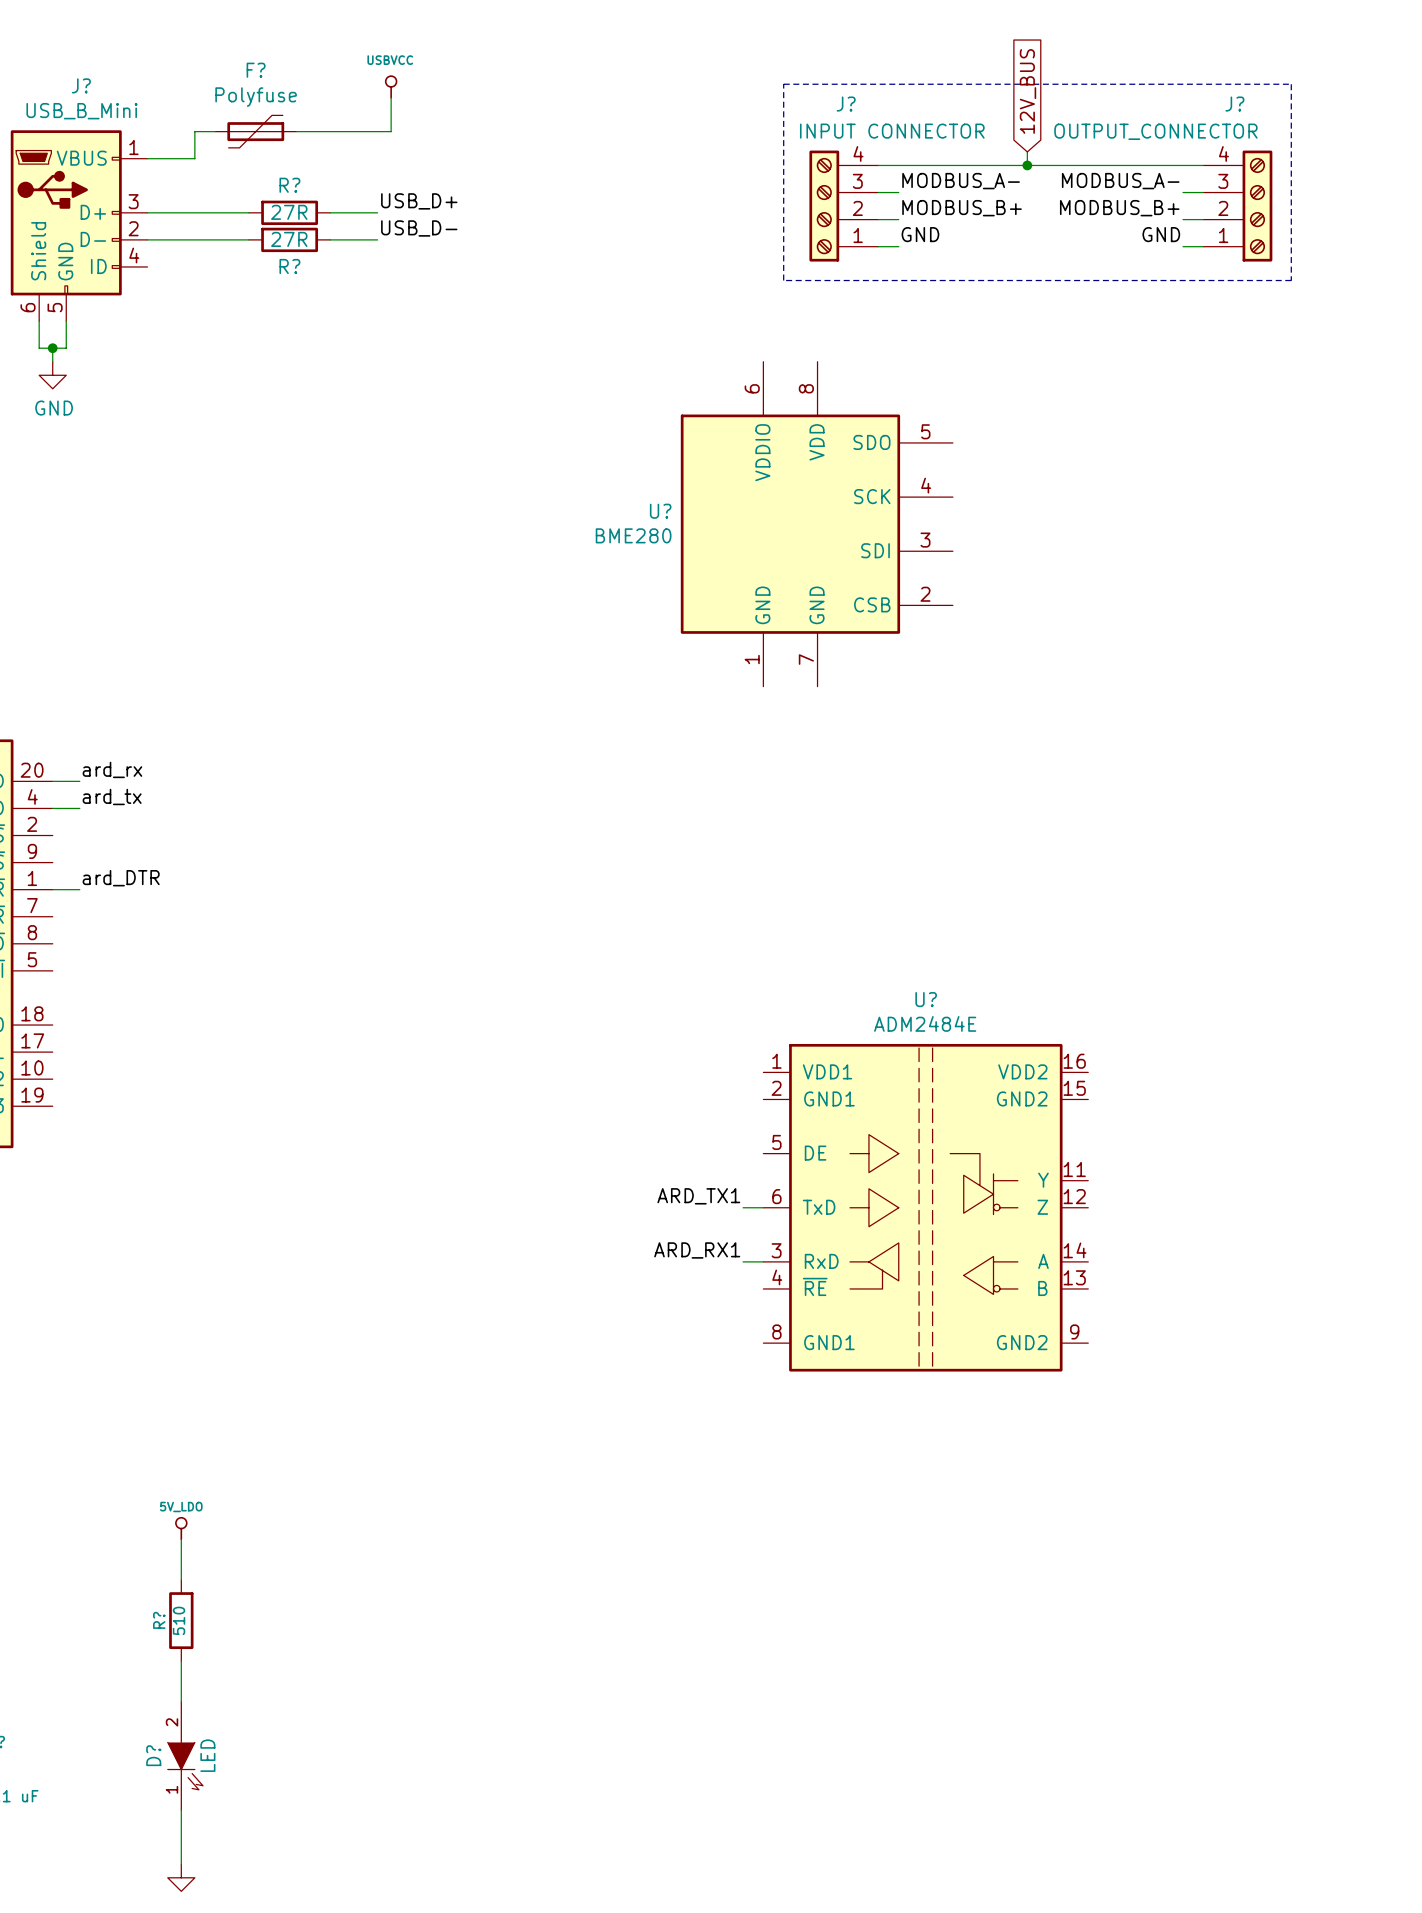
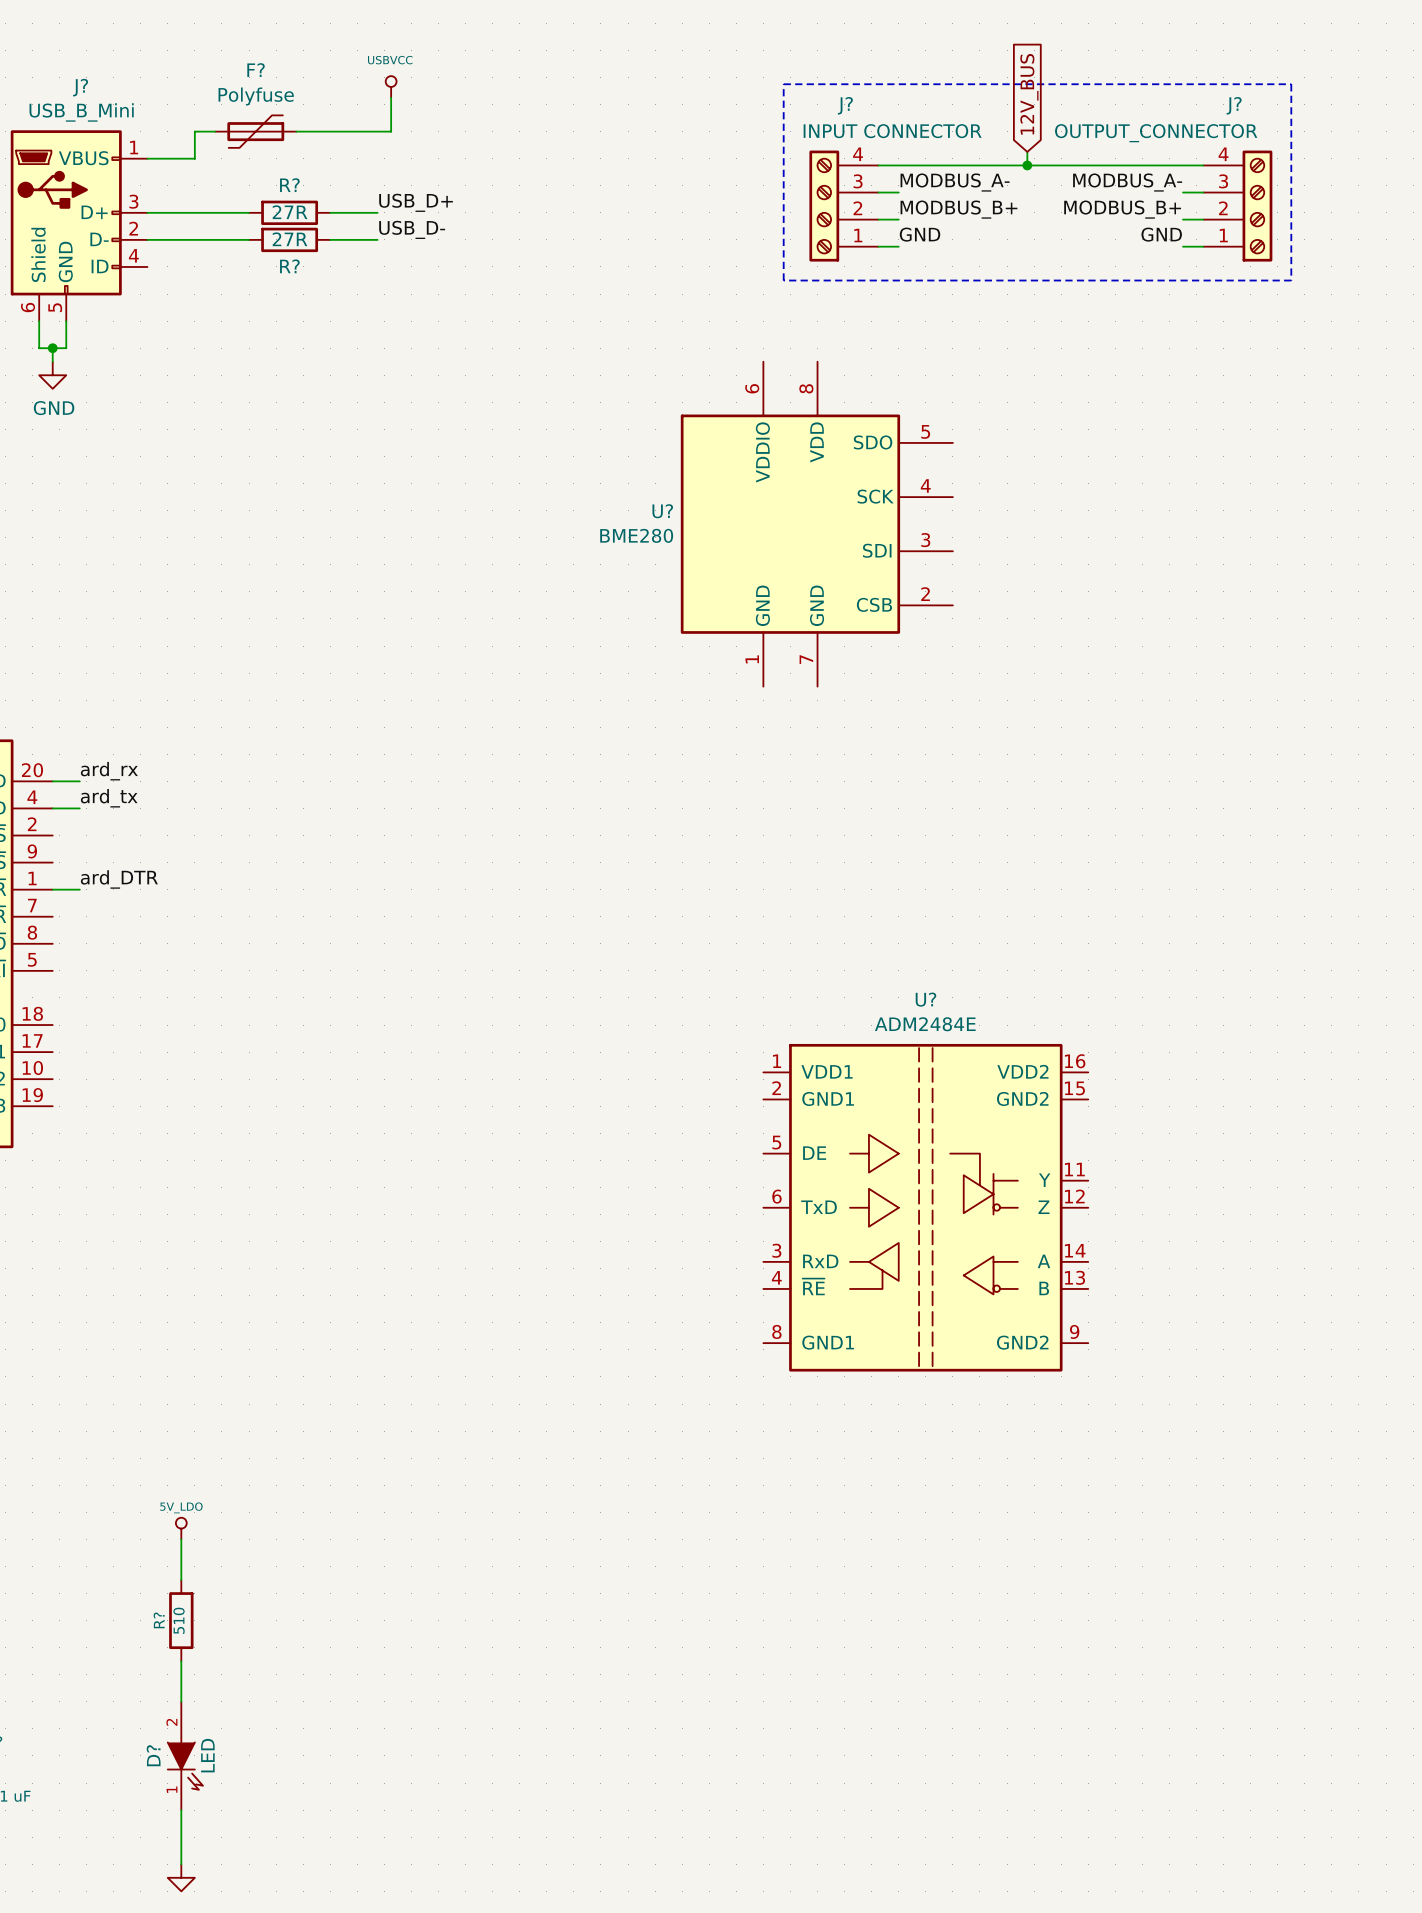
label: ARD_TX1 (698, 1196) -> none
wire: (743, 1207) (763, 1207) -> none
label: ARD_RX1 (697, 1250) -> none
wire: (743, 1261) (763, 1261) -> none

